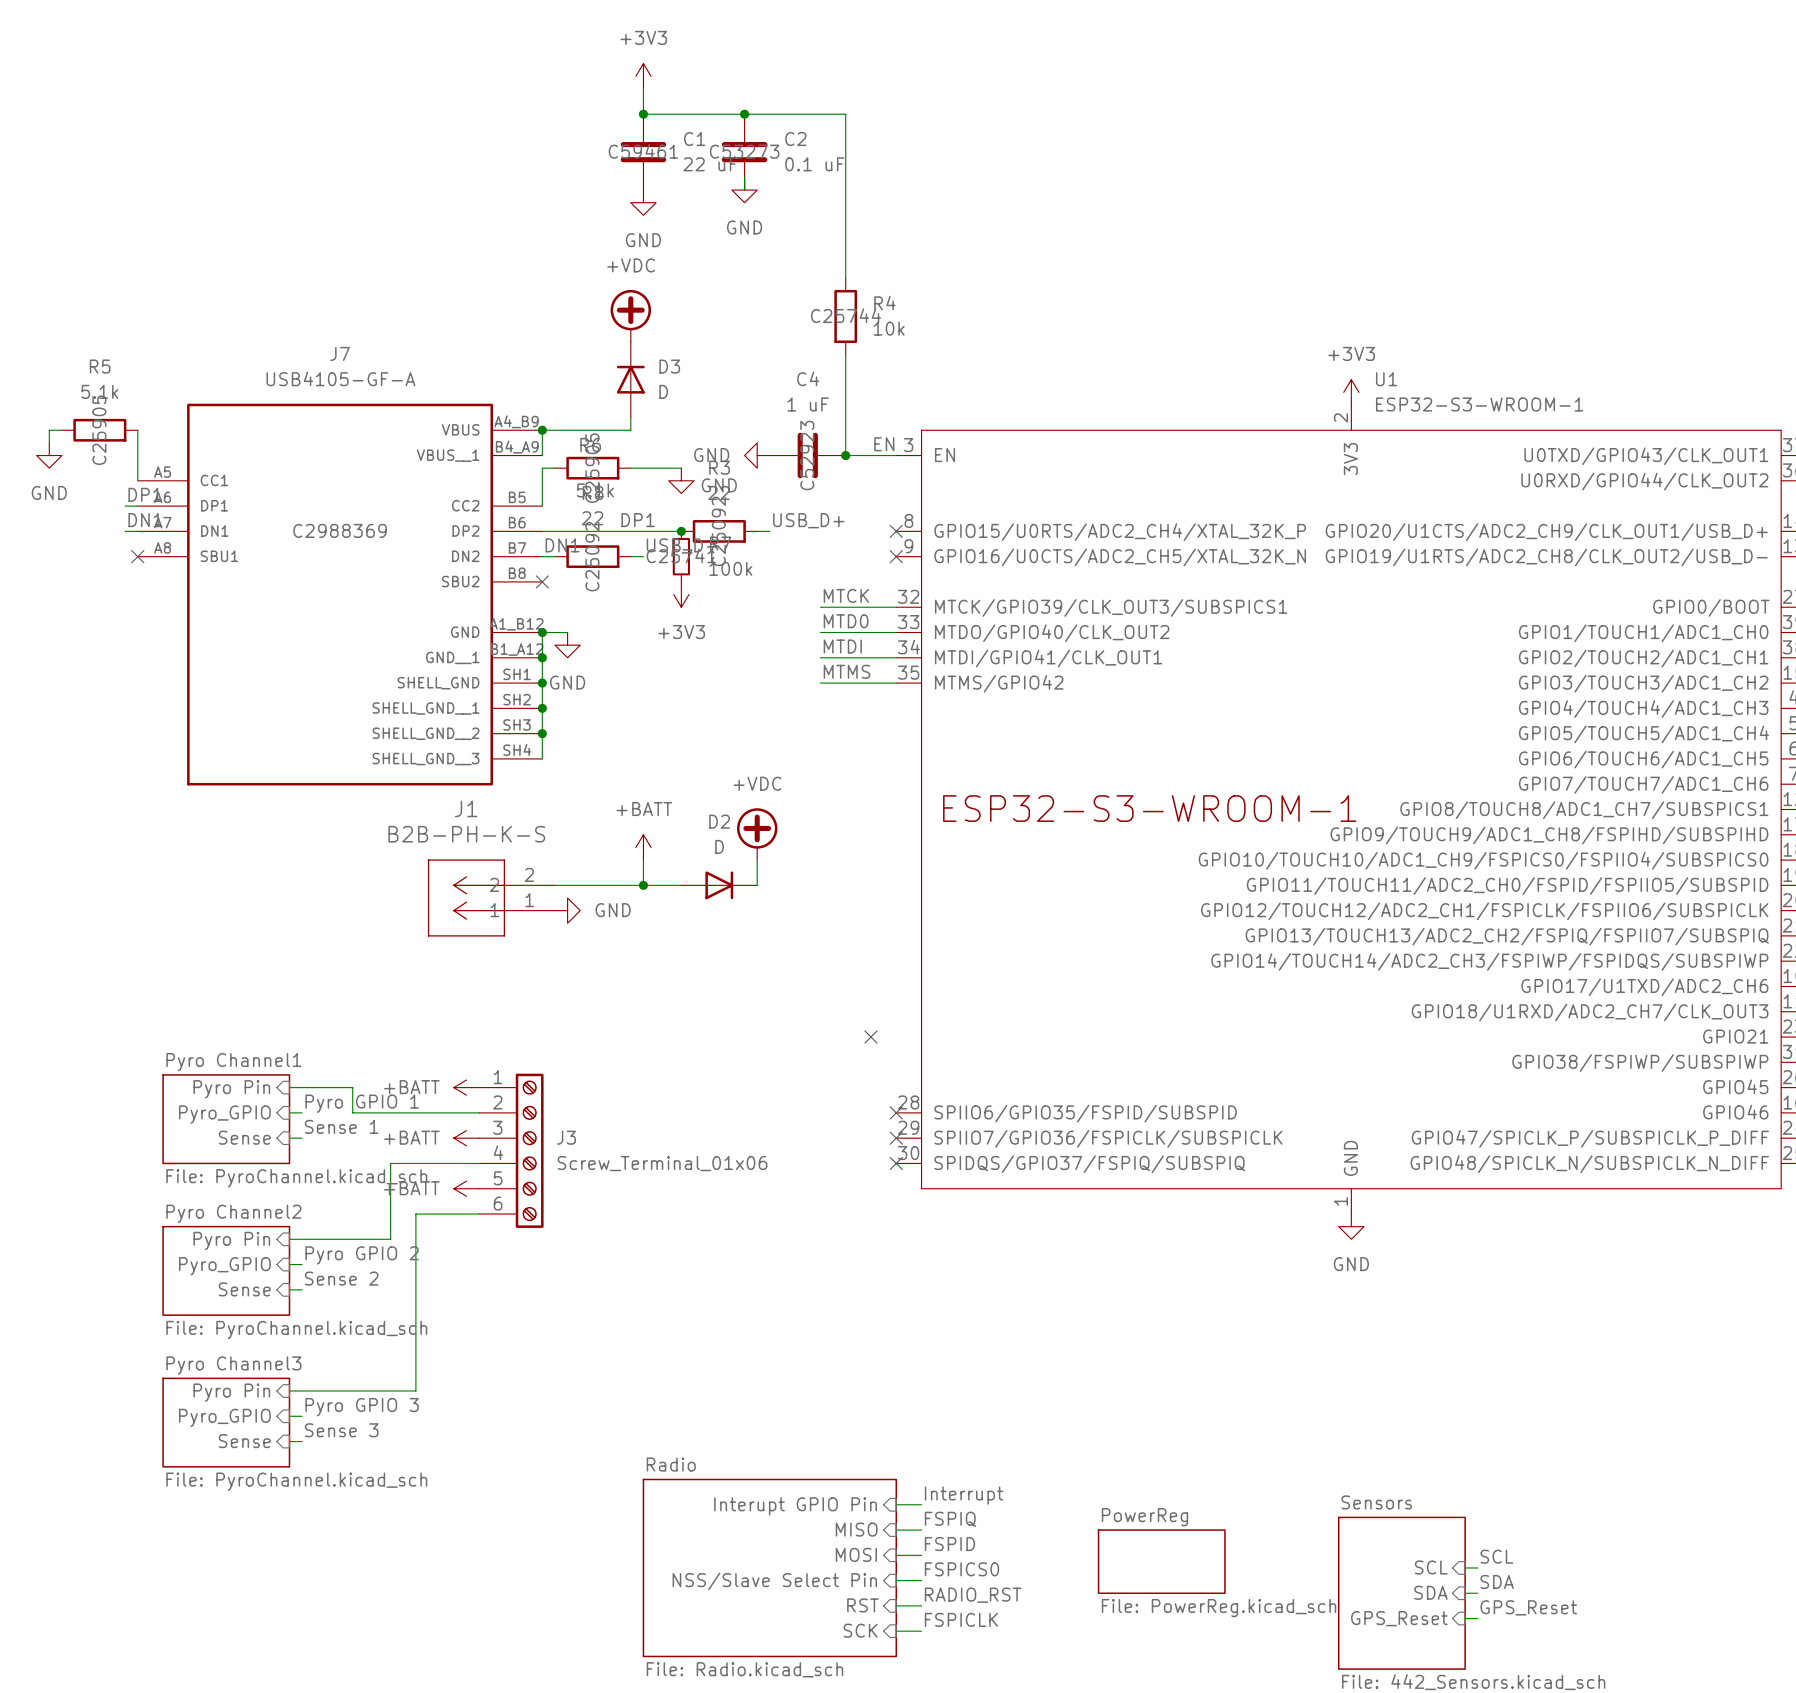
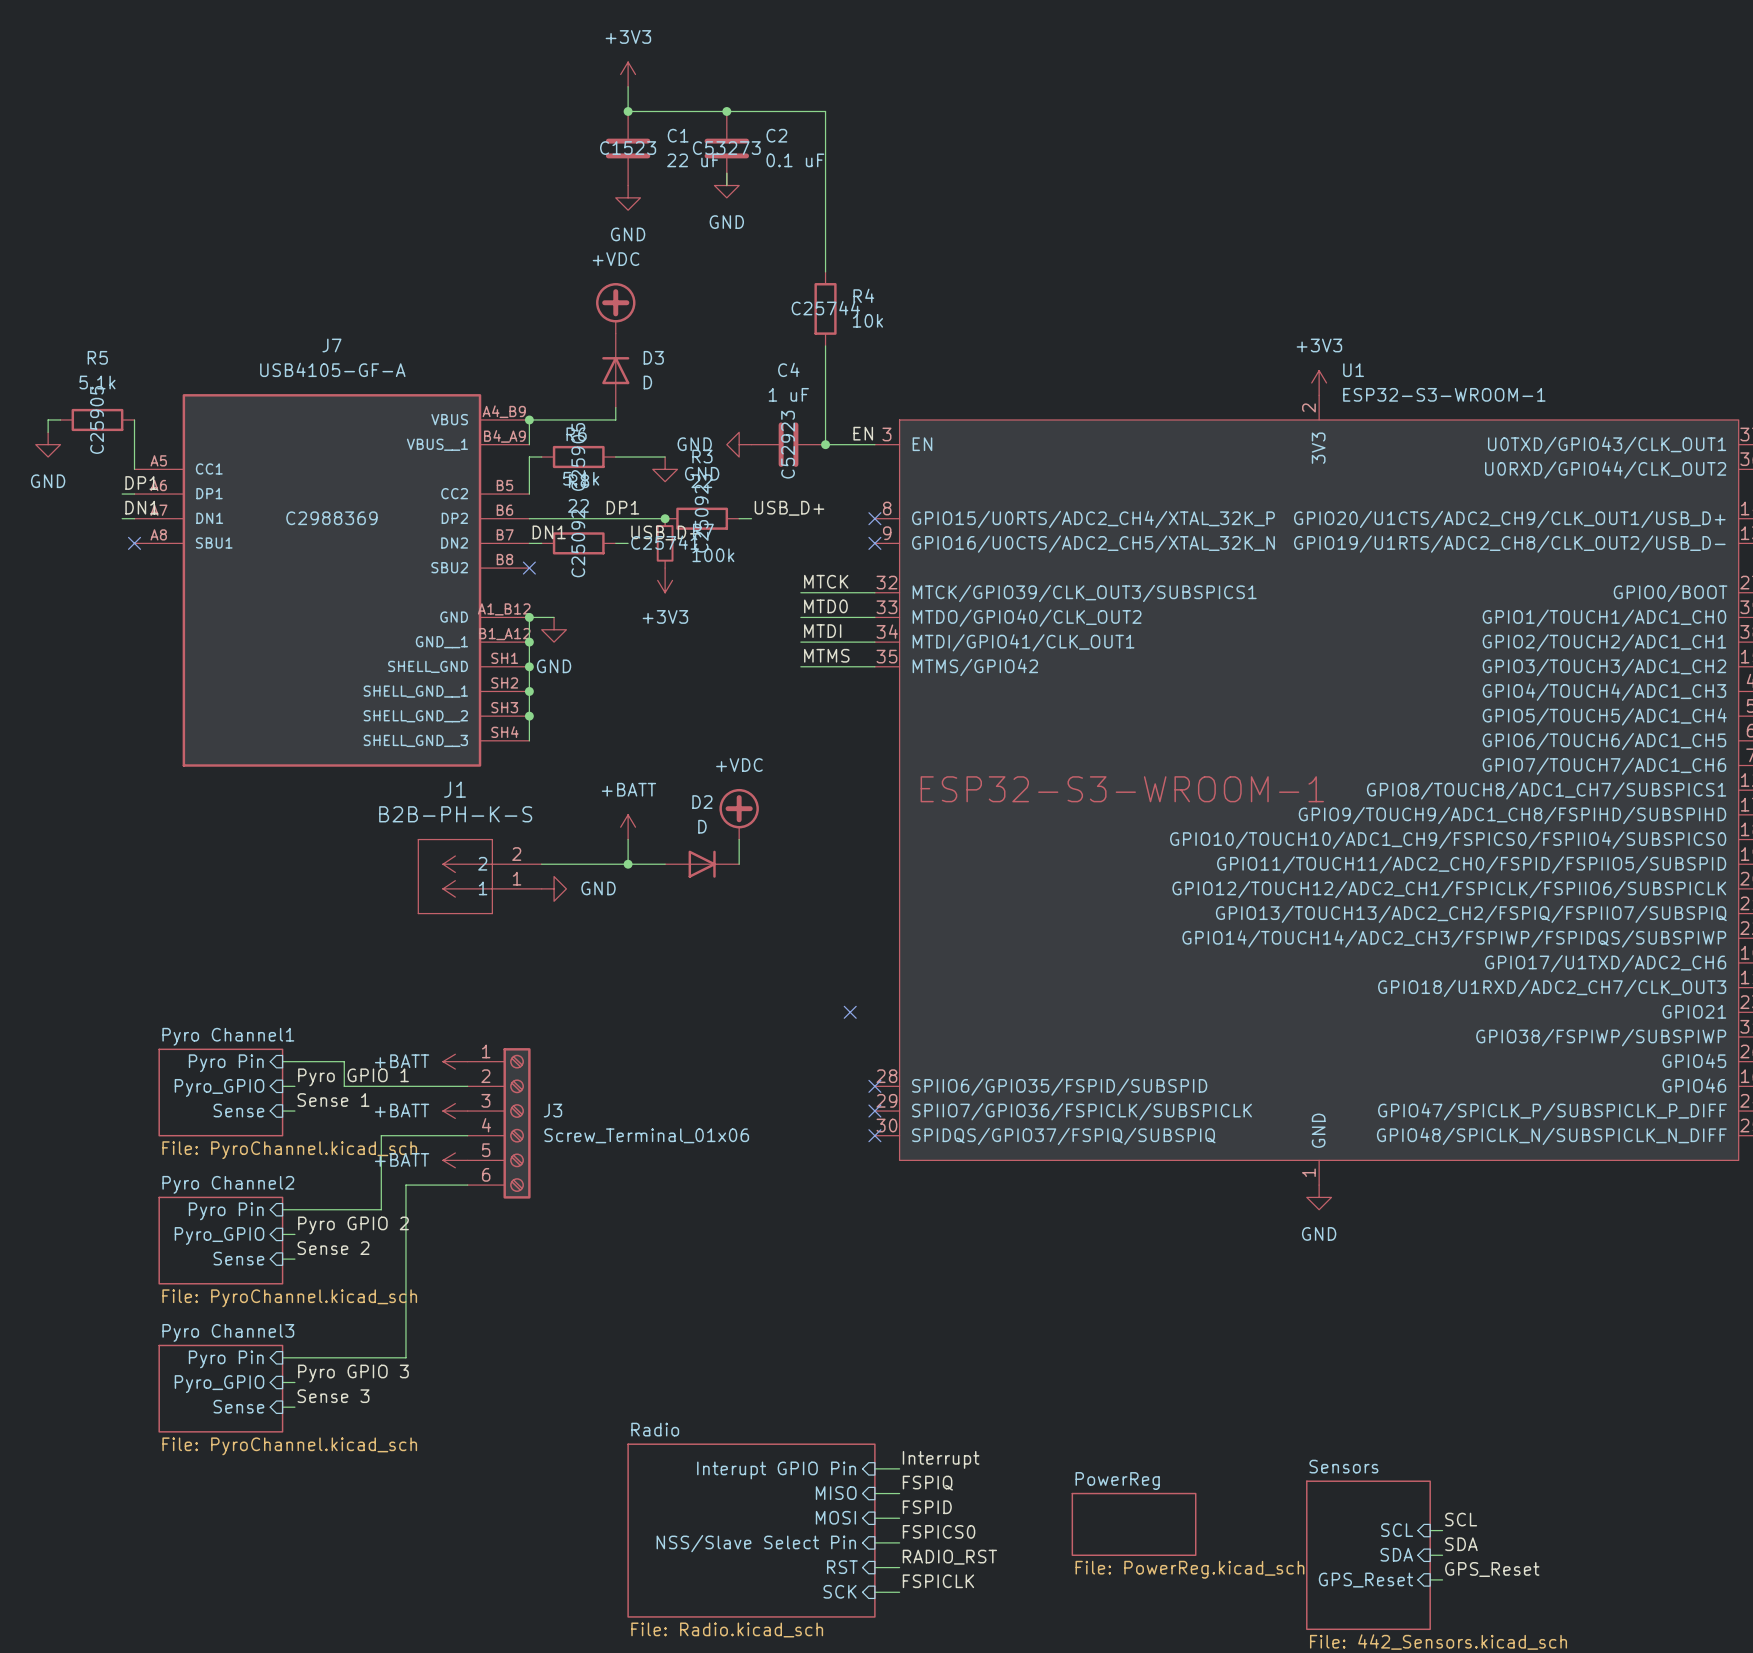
C1 text: C59461 (643, 151) -> C1523 (628, 148)

